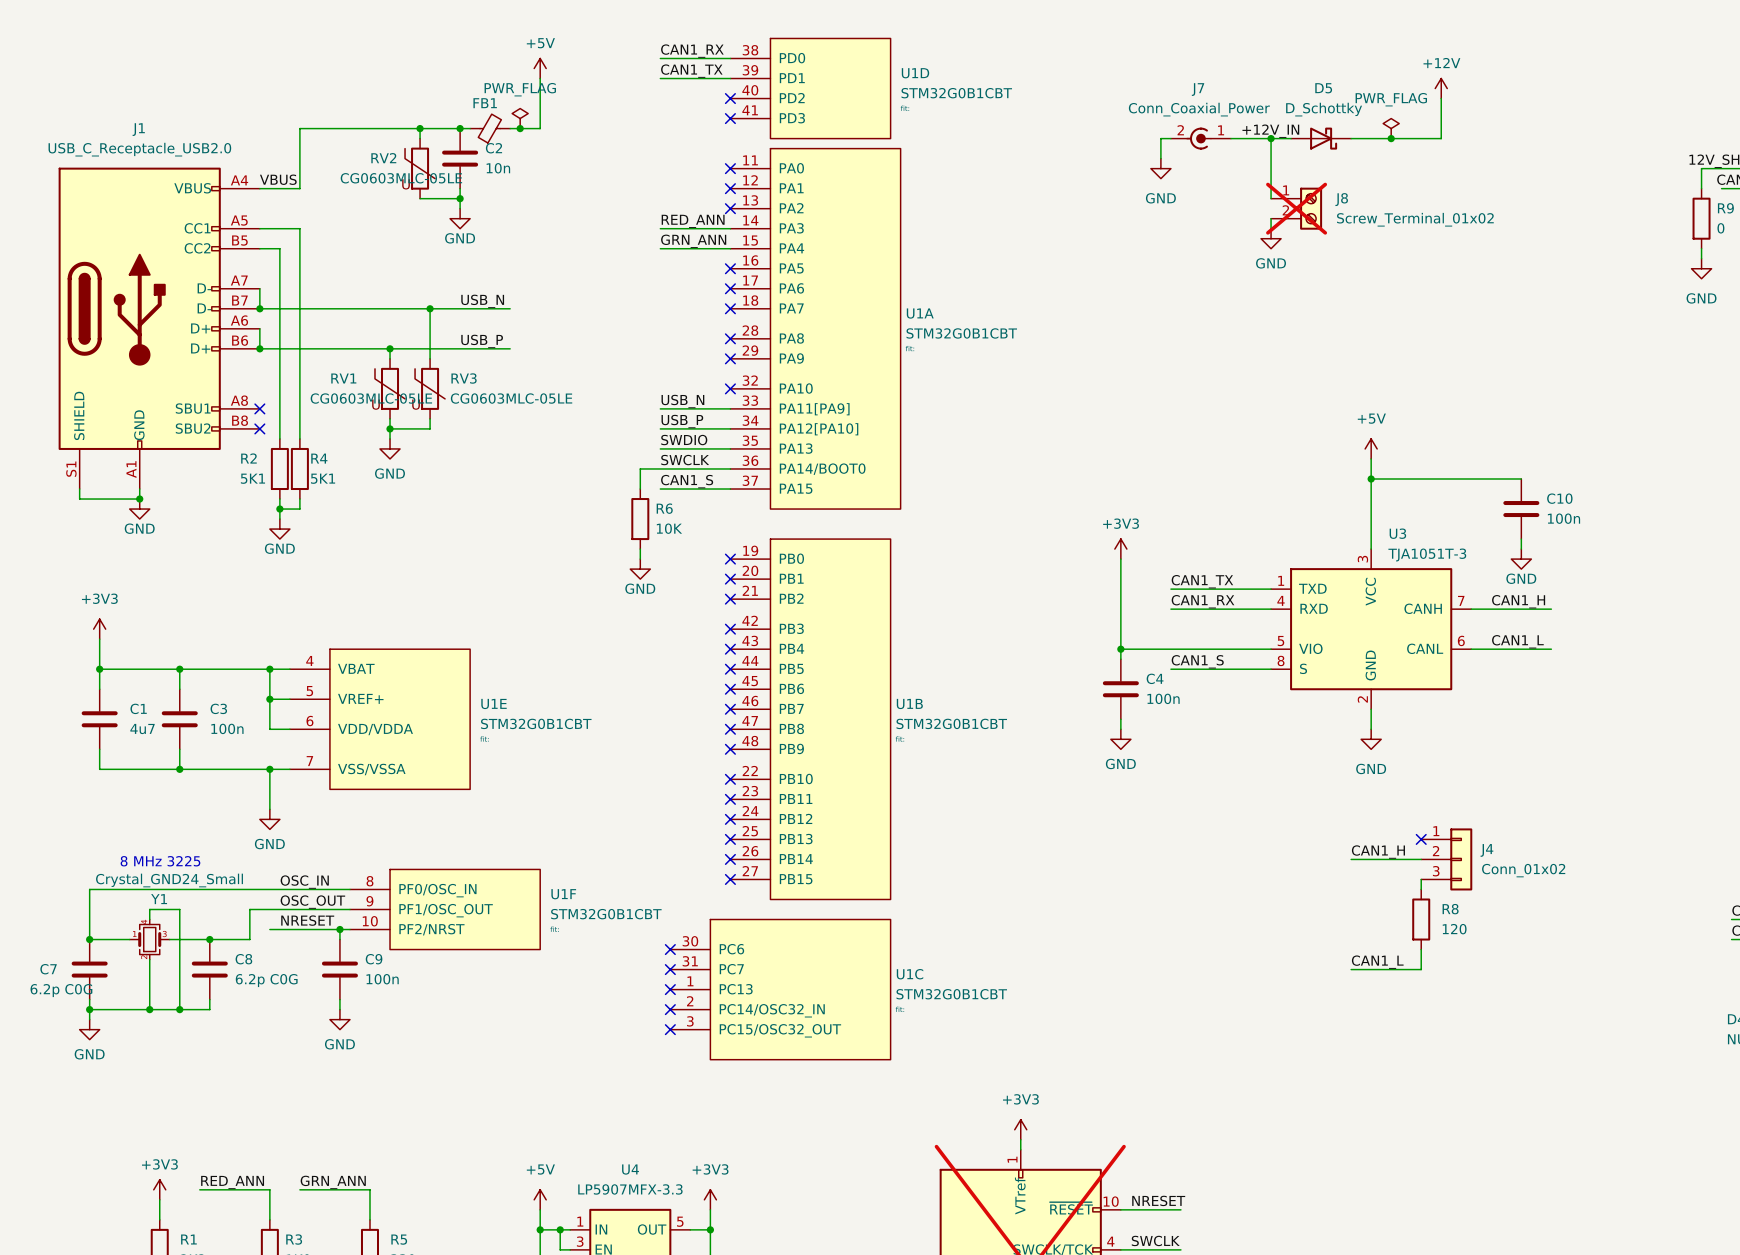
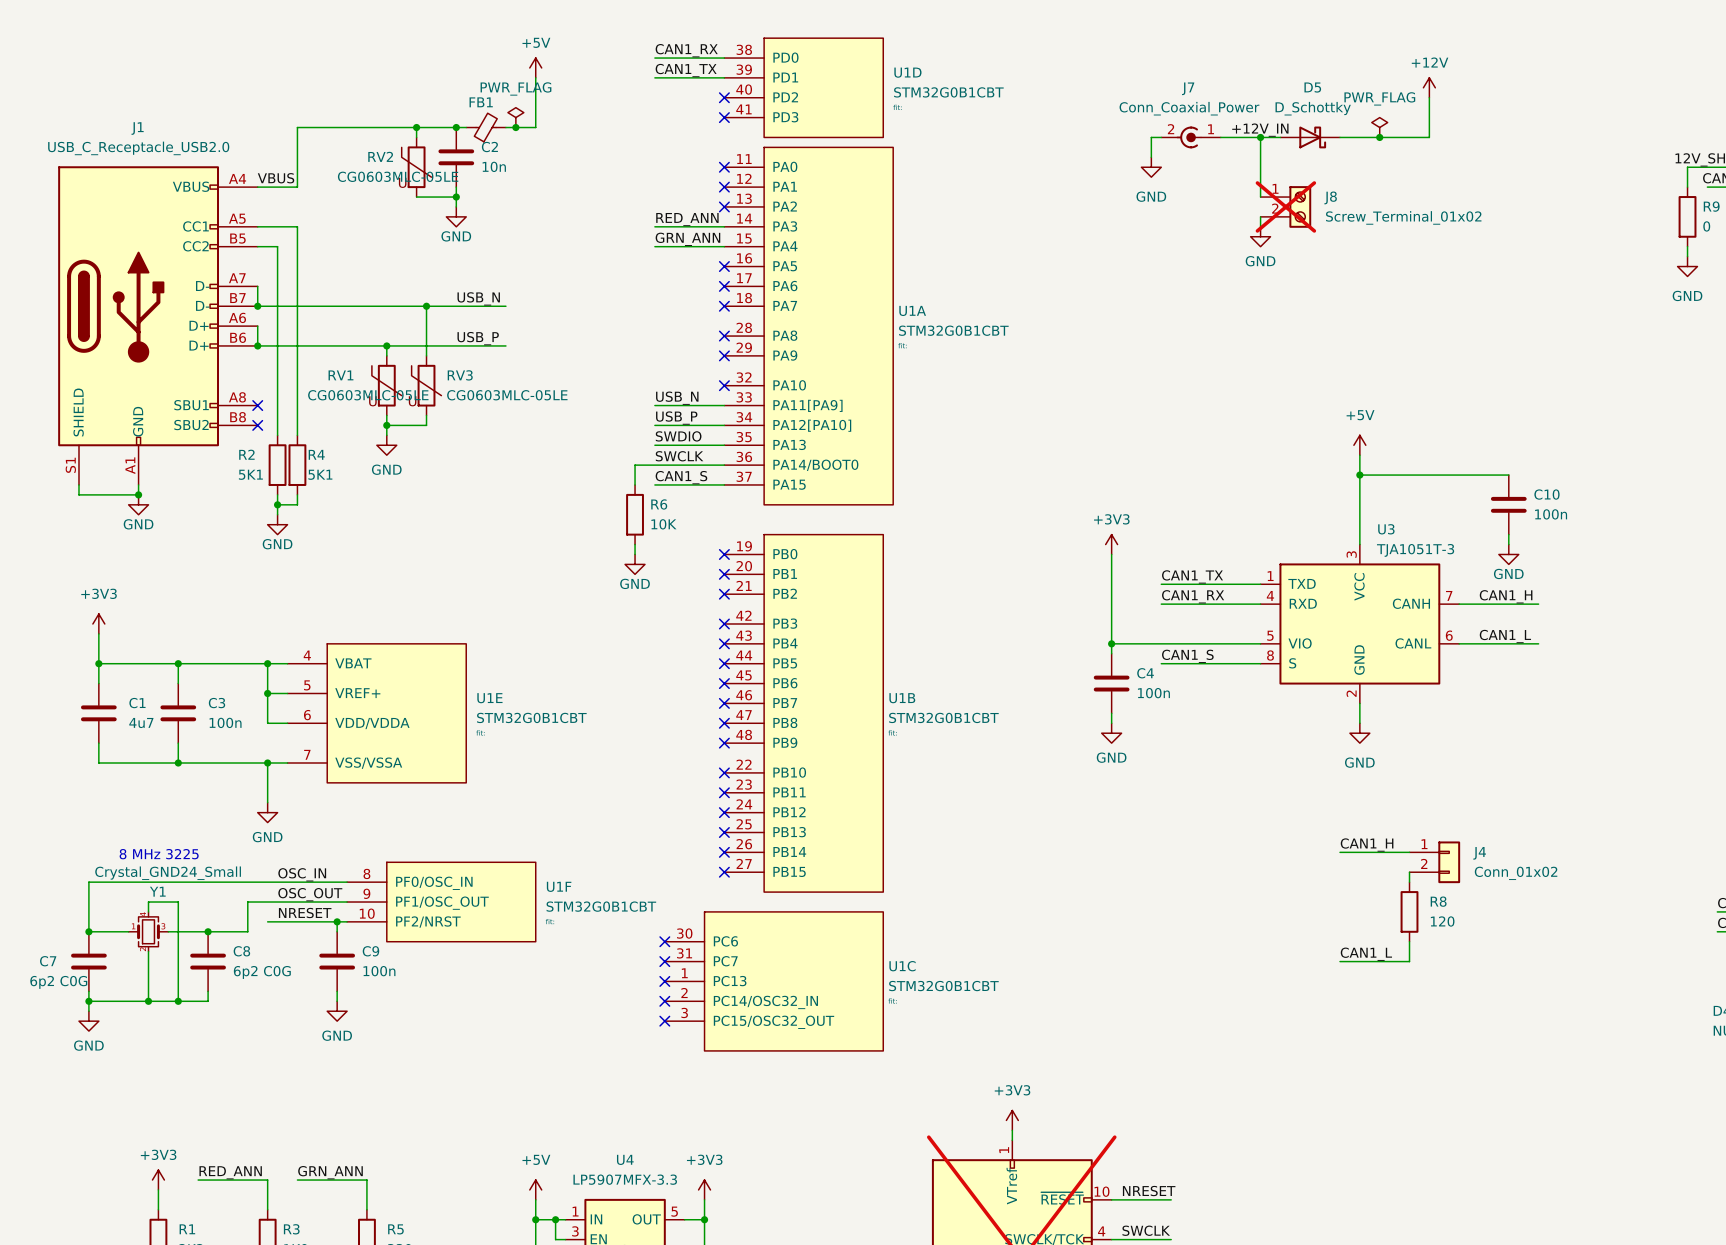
J4 symbol: [1421, 828, 1473, 891] -> [1409, 841, 1461, 884]
no-connect mark: (1421, 839) -> none
C8 value: 6.2p C0G (266, 980) -> 6p2 C0G (262, 972)
C7 value: 6.2p C0G (61, 990) -> 6p2 C0G (58, 982)

